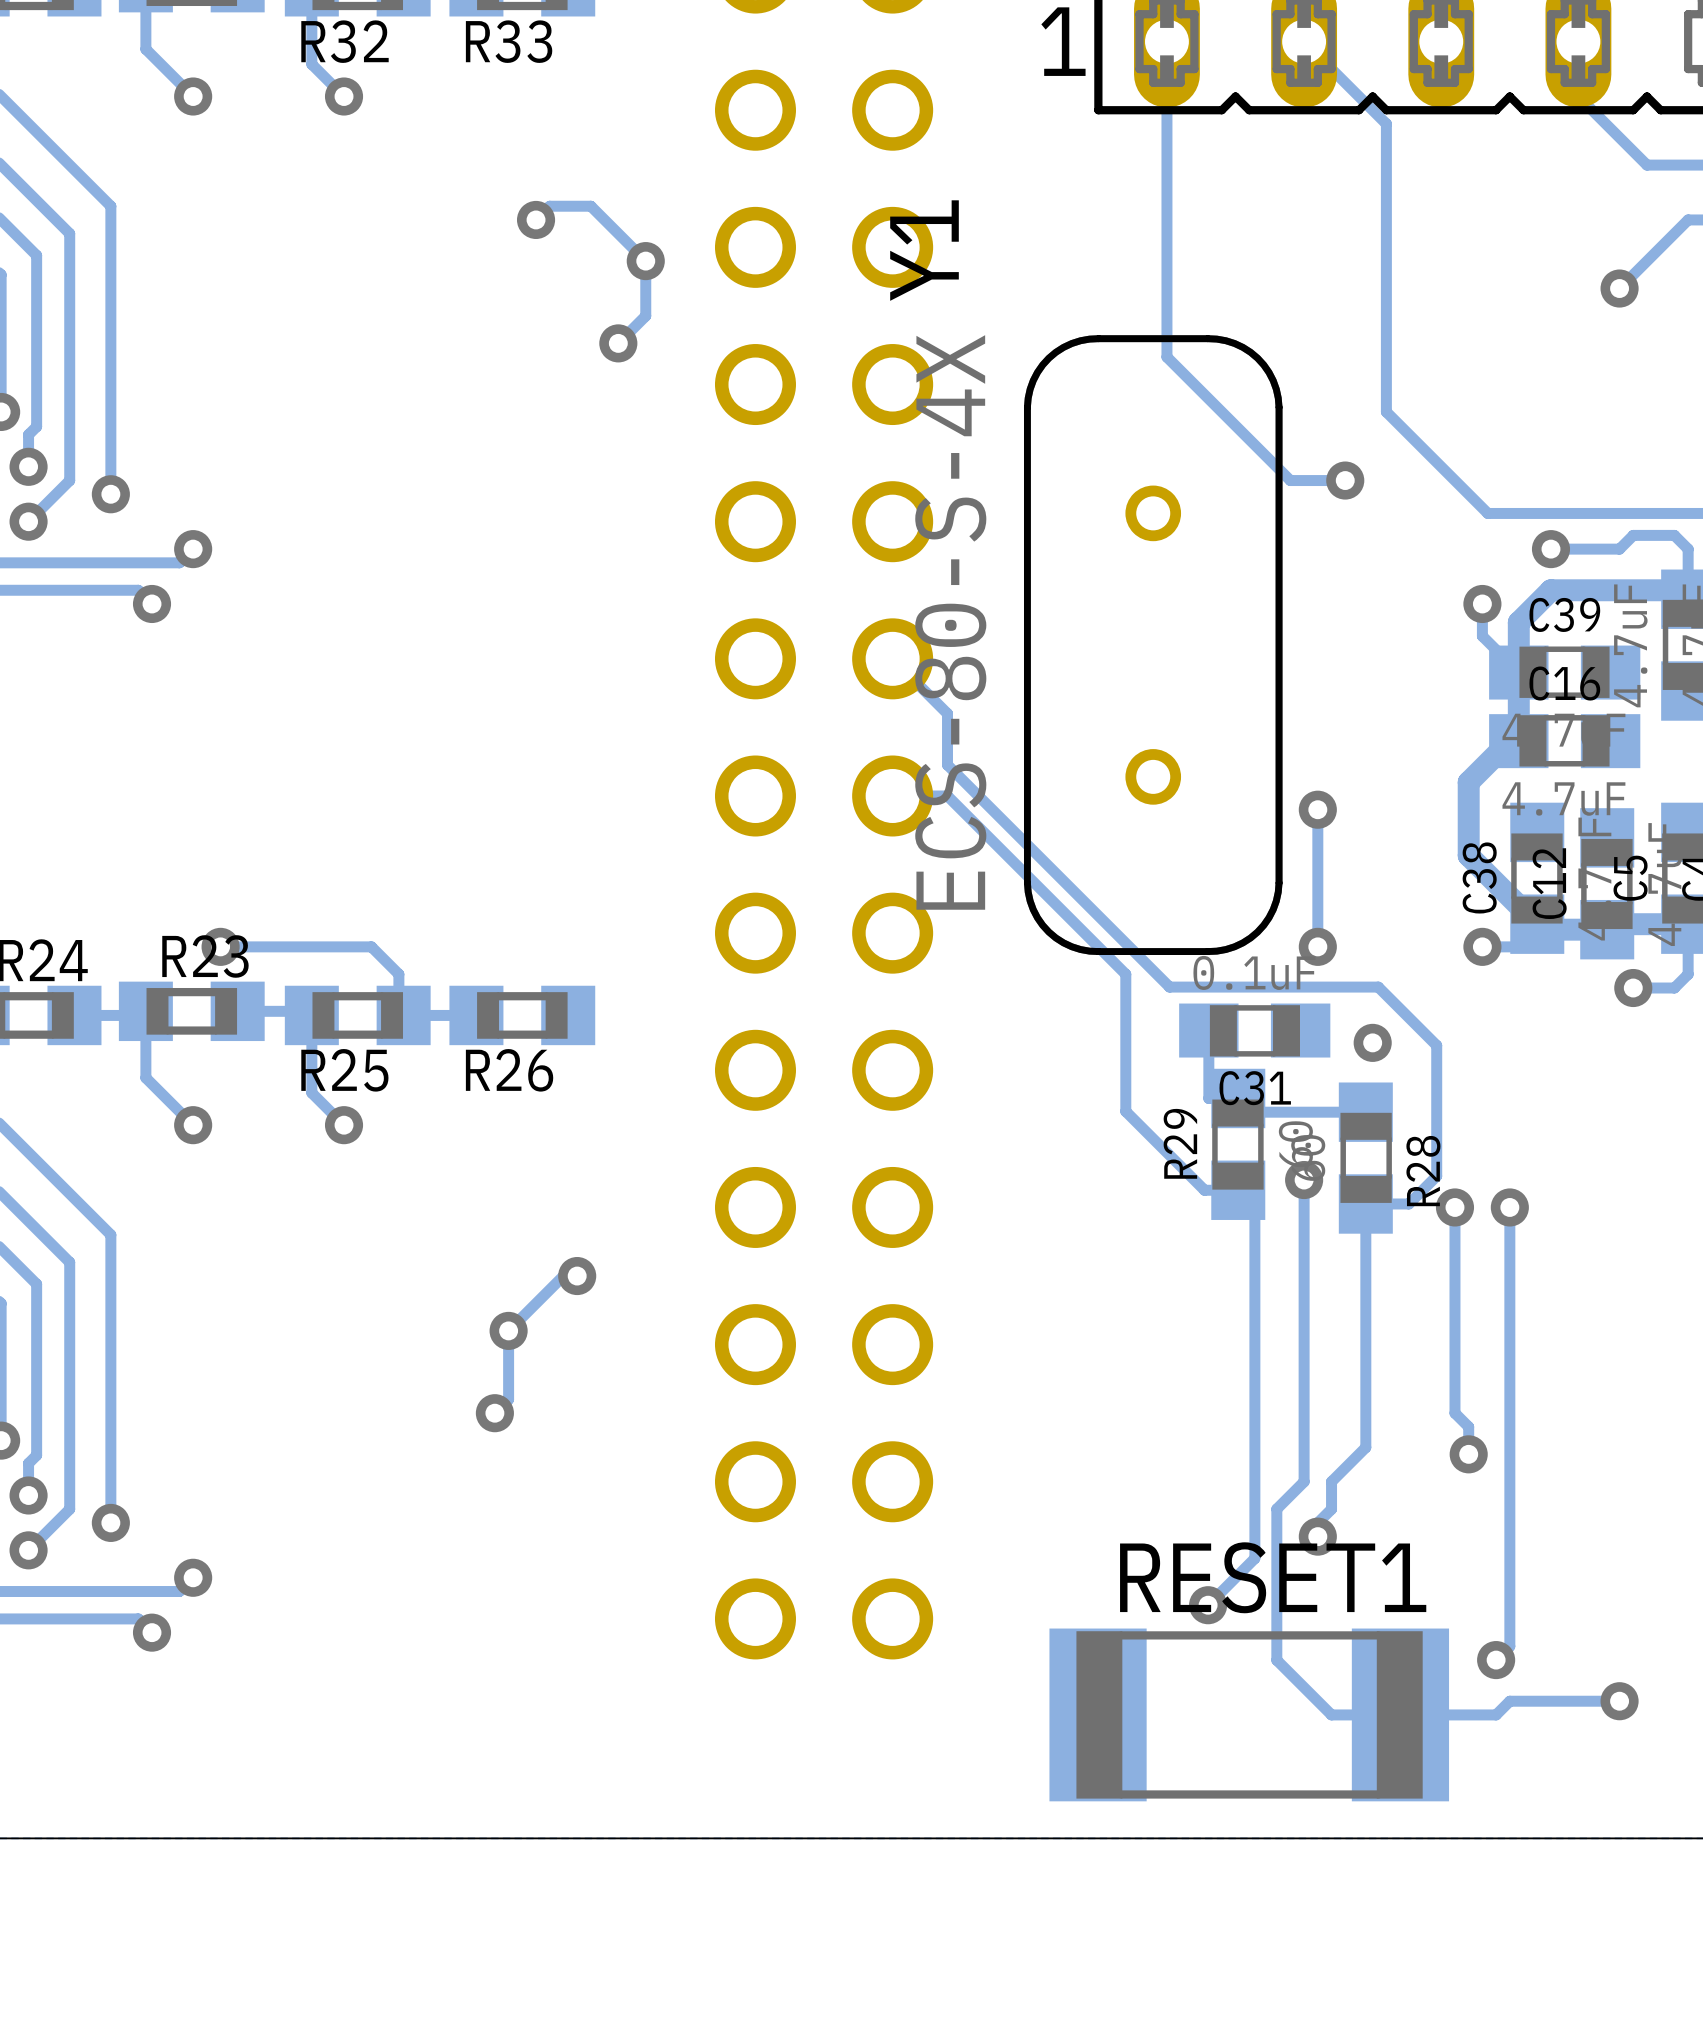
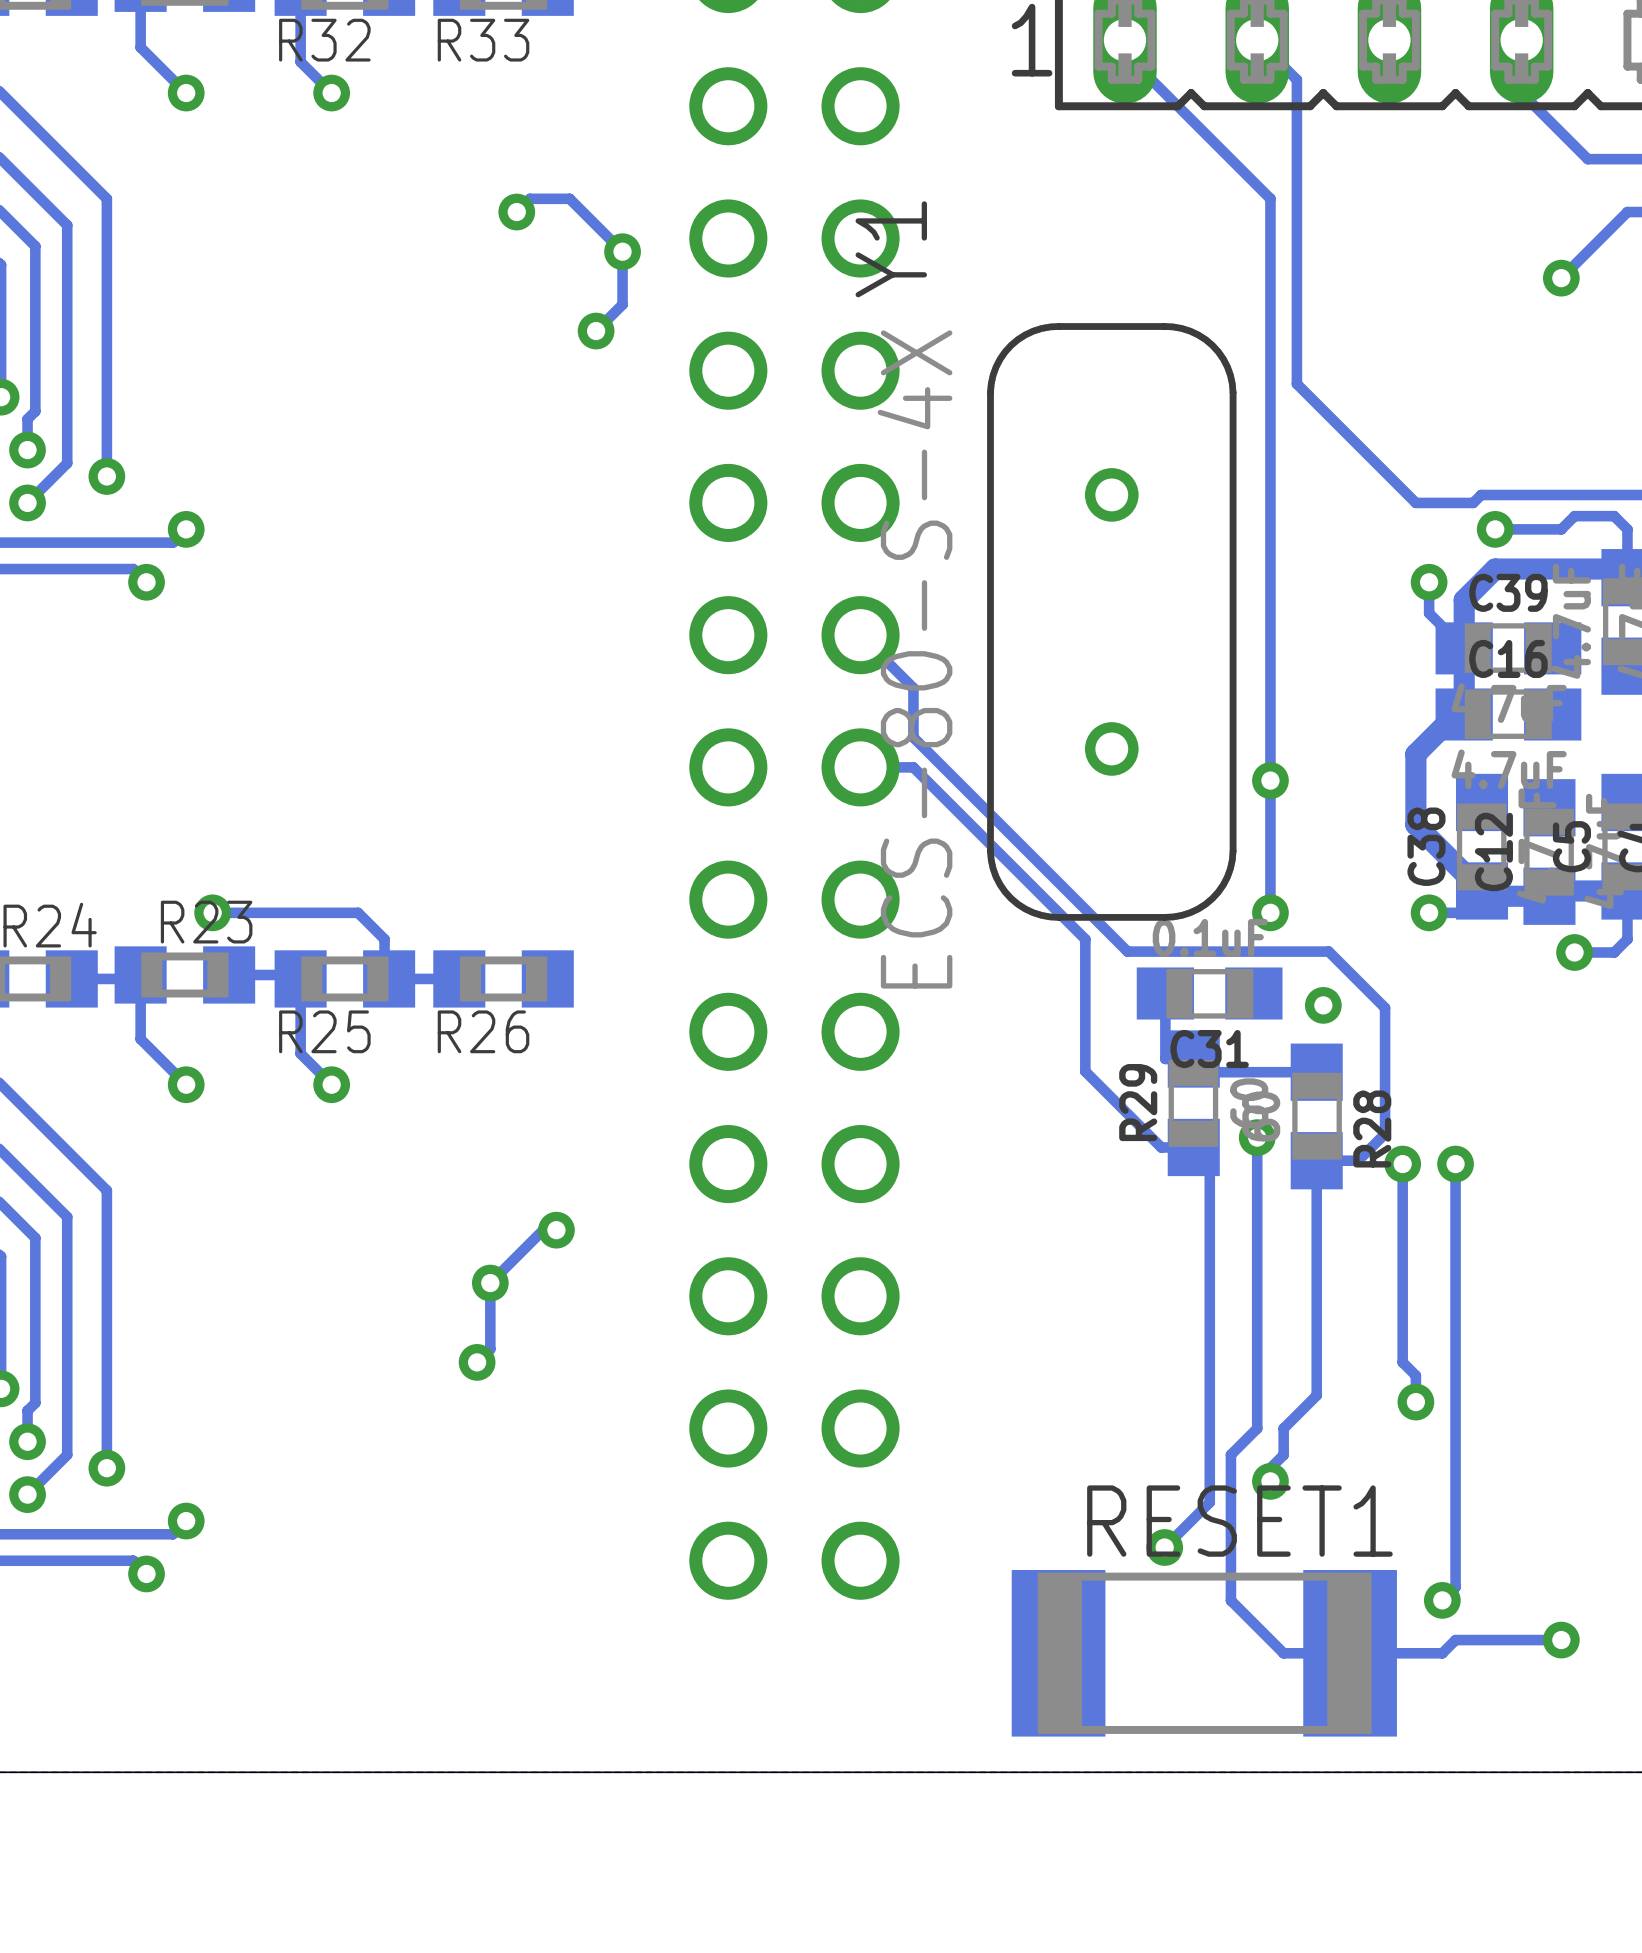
track: (1166, 55) (1166, 357) (1290, 480) (1345, 480) -> (1125, 53) (1270, 198) (1270, 780)
track: (1345, 82) (1386, 123) (1386, 411) (1487, 513) (1536, 513) -> (1296, 79) (1296, 383) (1415, 502) (1473, 502) (1481, 495)
via: (1345, 480) -> none

